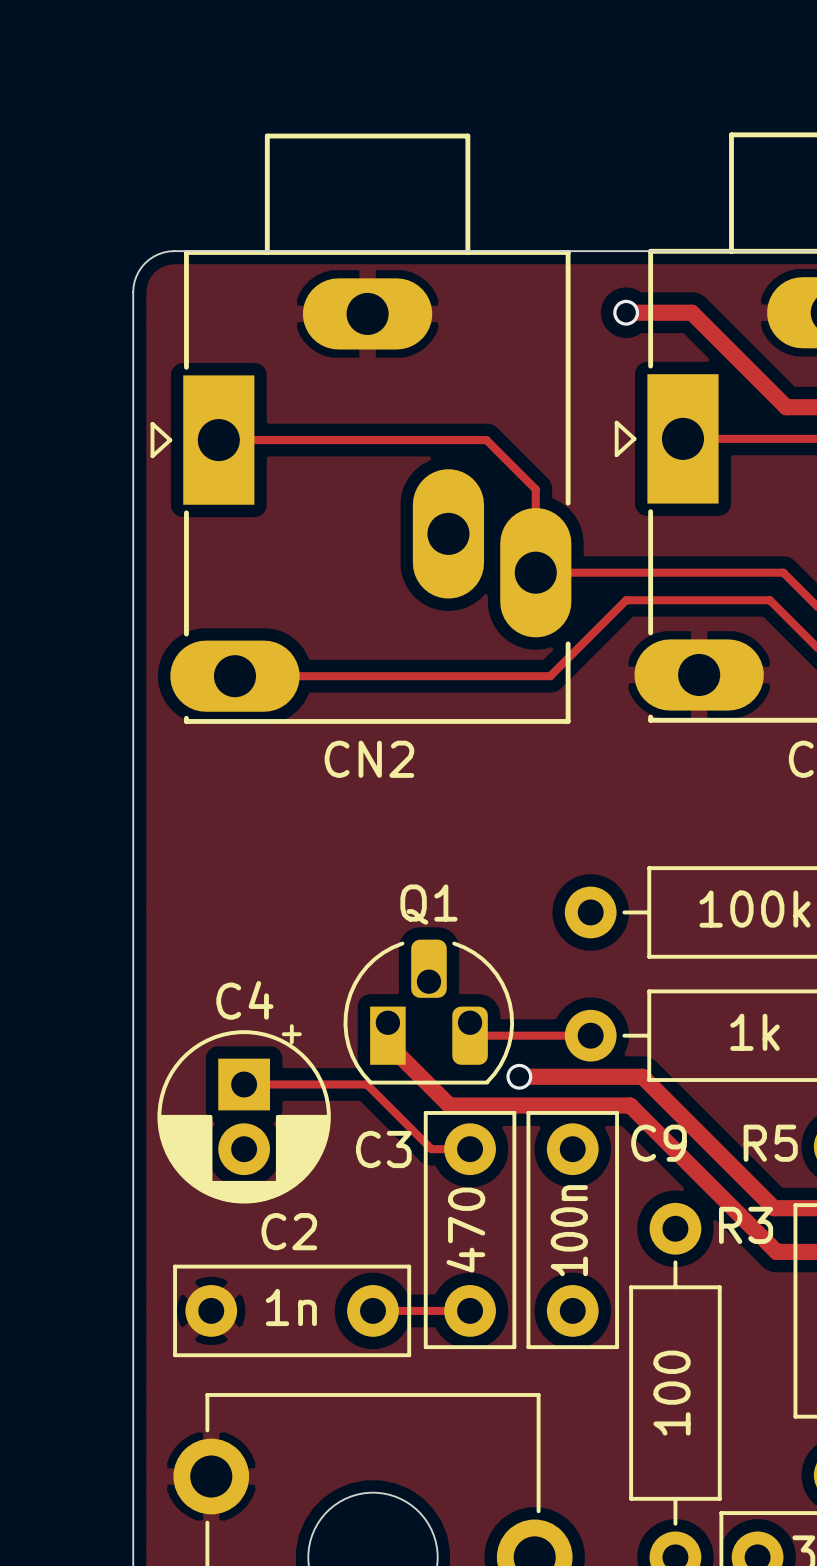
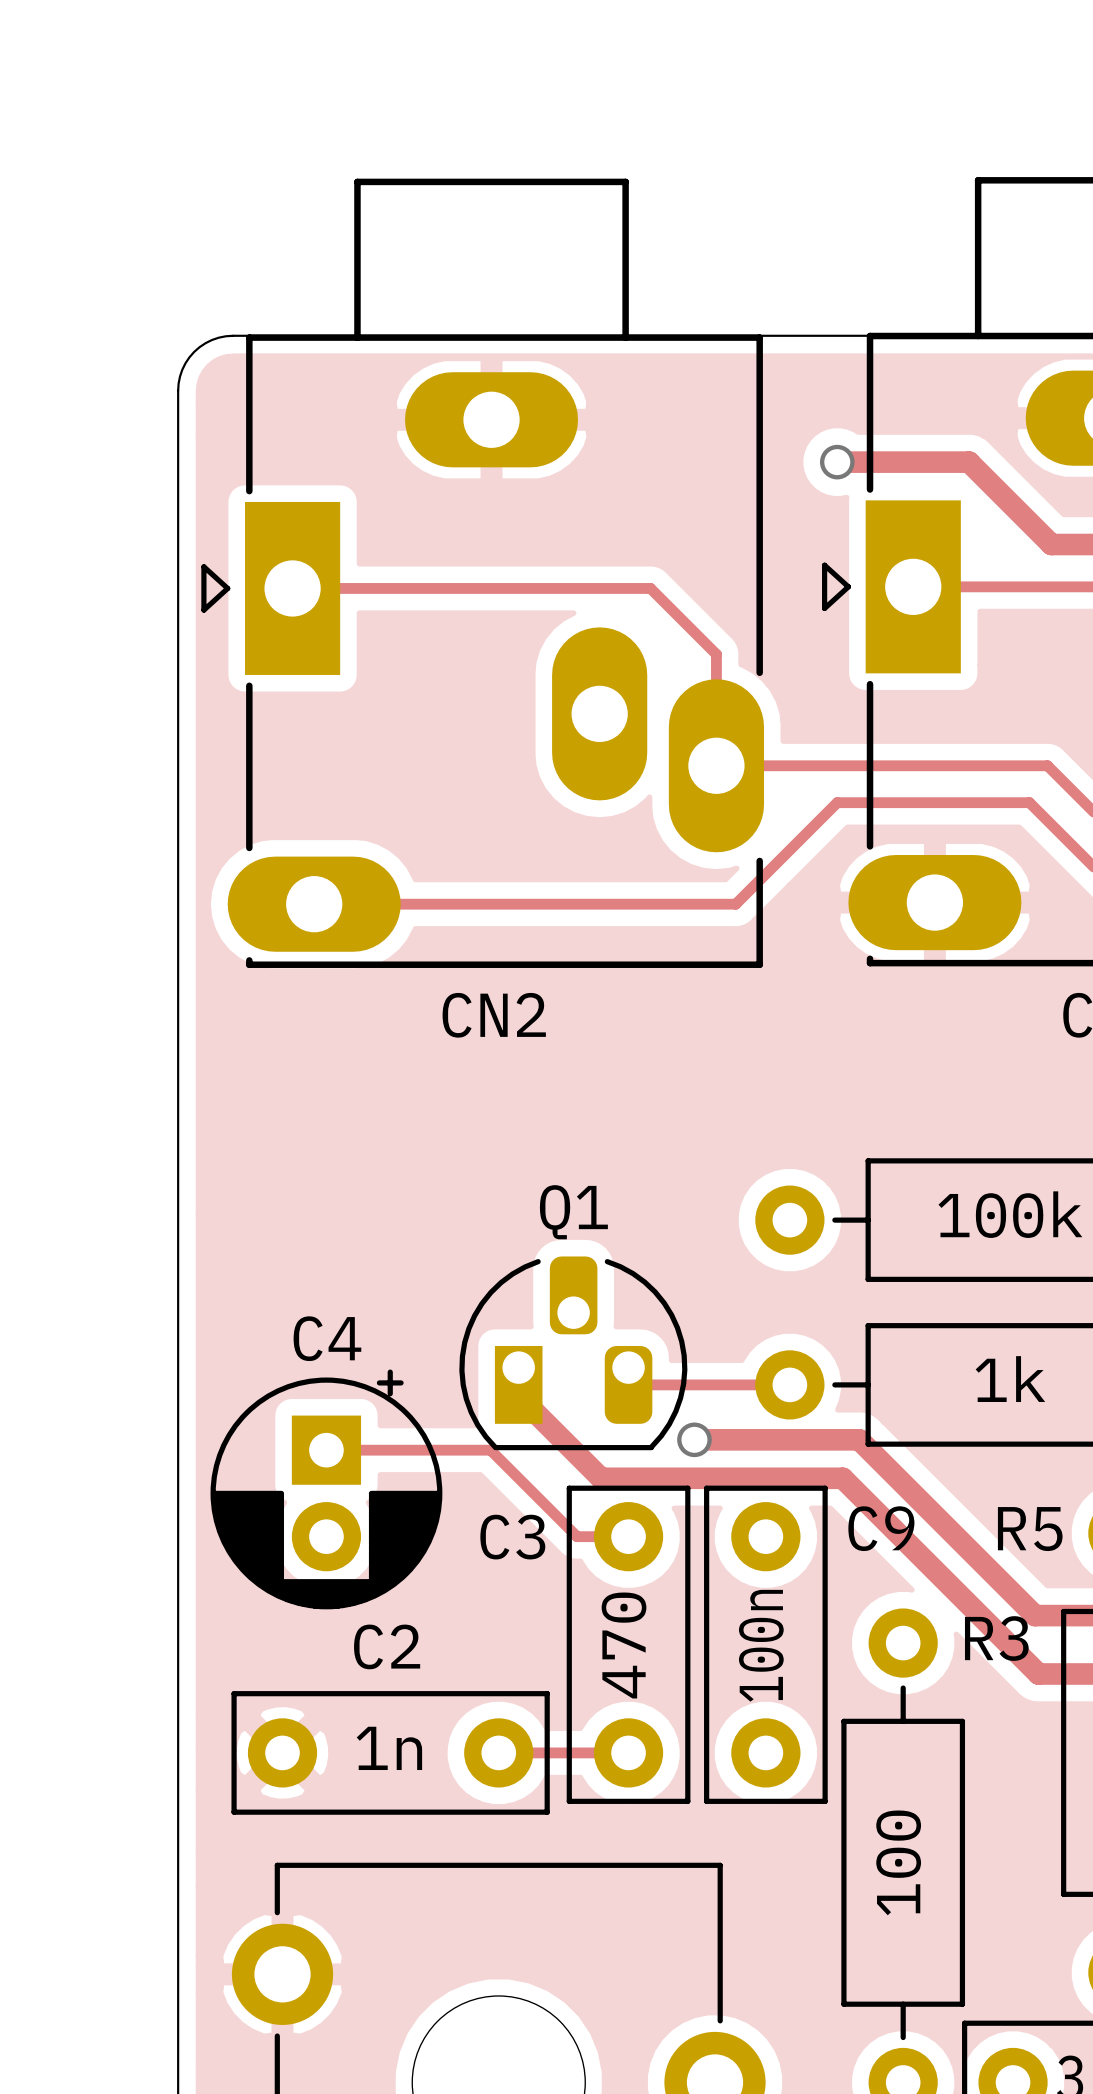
track: (626, 312) (691, 312) (724, 345) -> (837, 462) (969, 462)
via position: (626, 312) -> (837, 462)

